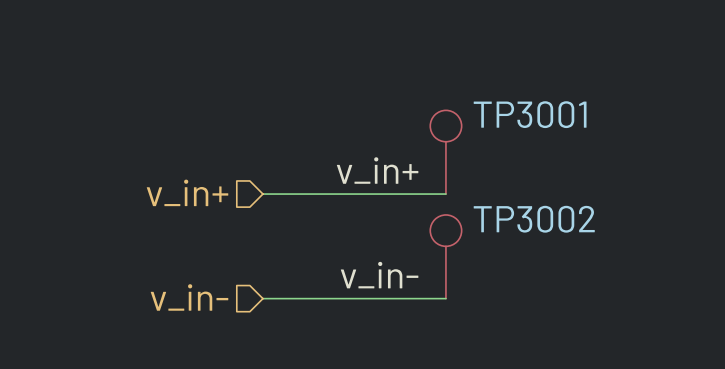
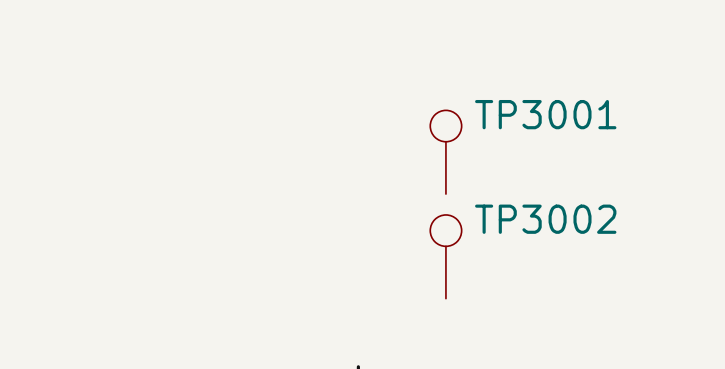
label: v_in+ (377, 170) -> none
hierarchical label: v_in+ (187, 192) -> none
wire: (262, 194) (445, 194) -> none
label: v_in- (379, 275) -> none
hierarchical label: v_in- (189, 297) -> none
wire: (262, 298) (445, 298) -> none

